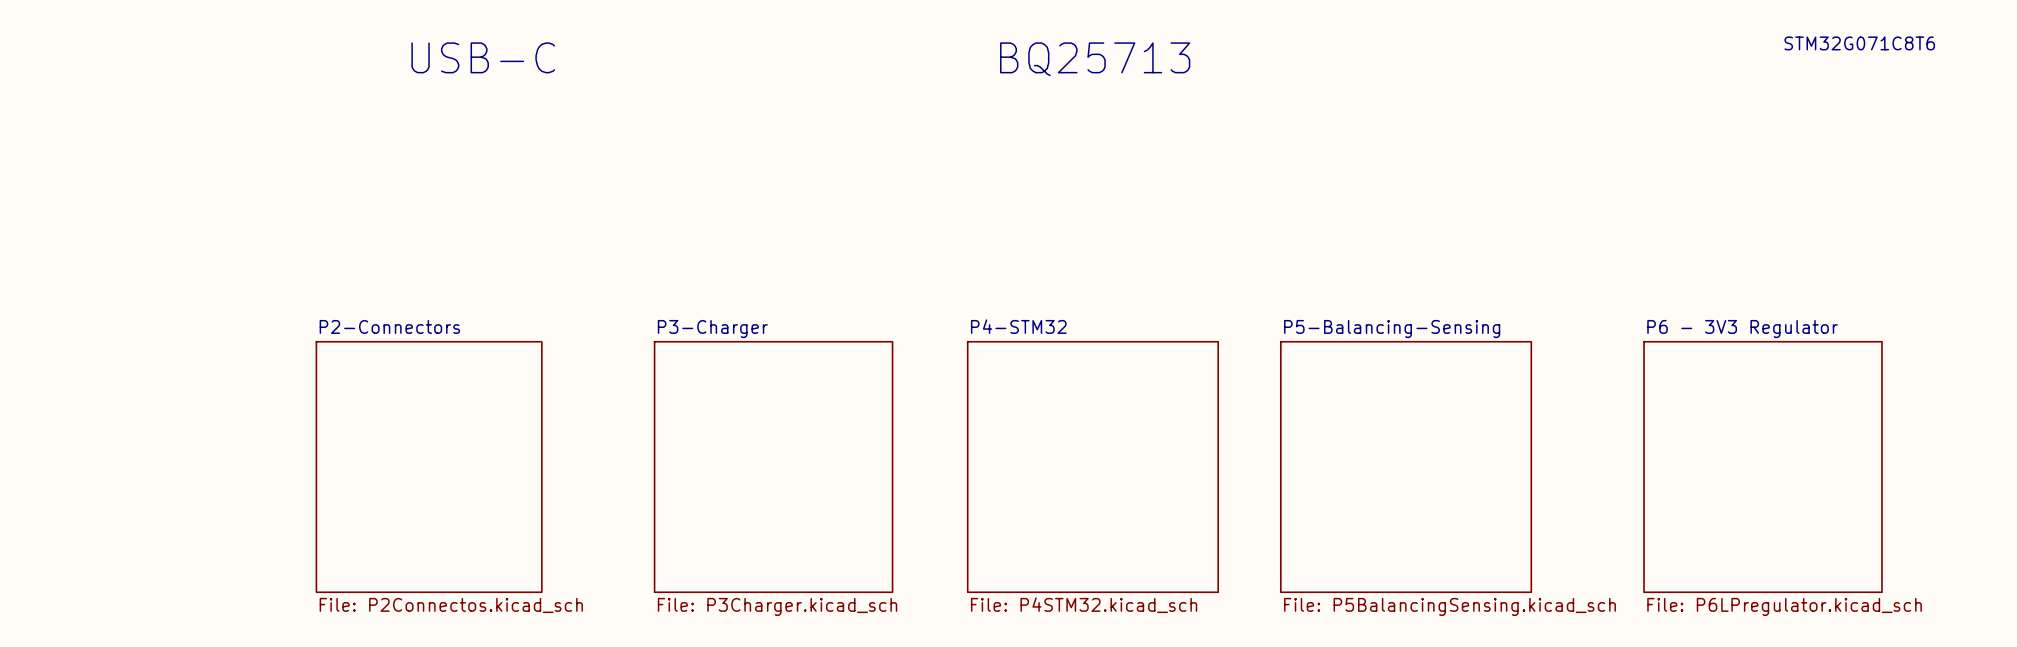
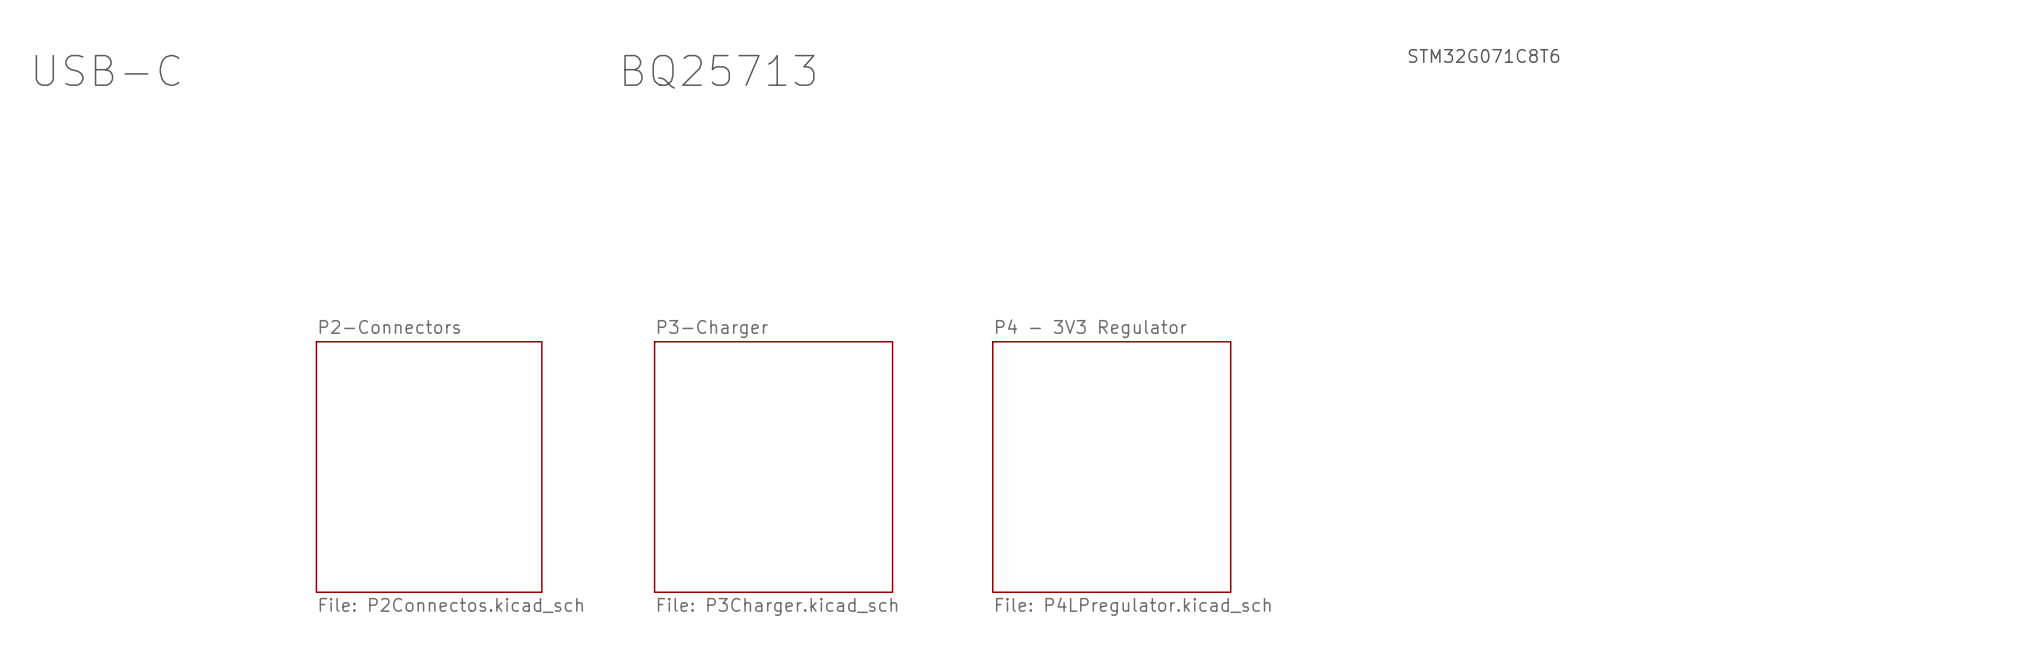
text: STM32G071C8T6 (1859, 43) -> none
text: none -> STM32G071C8T6 (1483, 55)
text: USB-C (483, 57) -> none
text: BQ25713 (1095, 59) -> none
text: none -> USB-C (107, 70)
text: none -> BQ25713 (719, 71)
sheet P4-STM32: File: P4STM32.kicad_sch (1092, 467) -> none
sheet P4 - 3V3 Regulator: none -> File: P4LPregulator.kicad_sch (1111, 467)
sheet P5-Balancing-Sensing: File: P5BalancingSensing.kicad_sch (1406, 467) -> none
sheet P6 - 3V3 Regulator: File: P6LPregulator.kicad_sch (1763, 467) -> none

